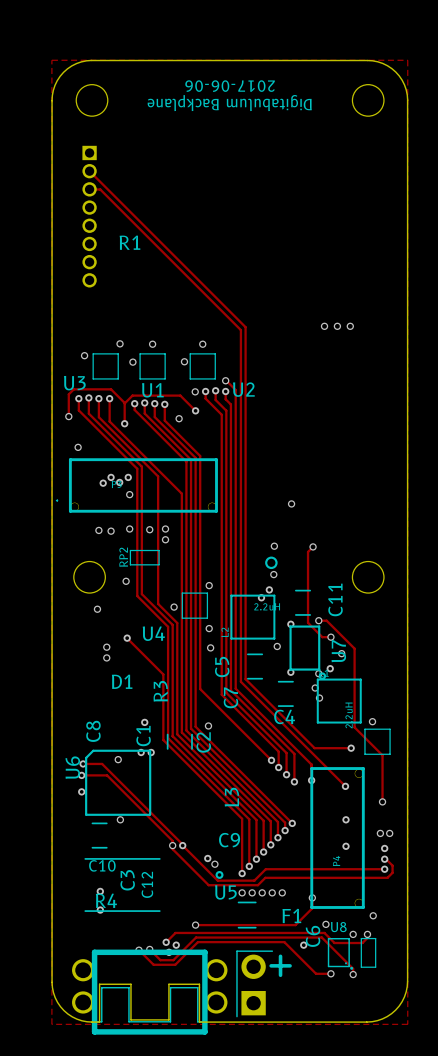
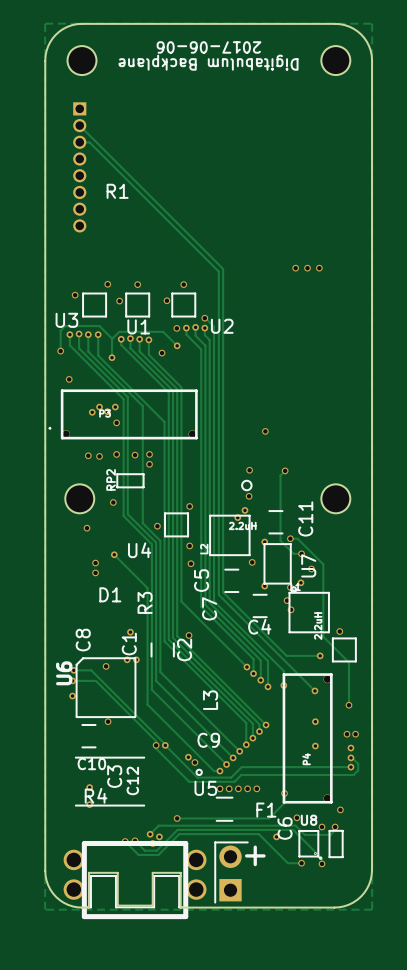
track: (177, 734) (263, 820) (263, 852) -> (160, 643) (160, 671) (239, 751)
track: (172, 736) (256, 819) (256, 859) -> (156, 644) (156, 680) (233, 757)
track: (168, 738) (249, 819) (249, 866) -> (151, 646) (151, 689) (226, 764)
track: (163, 740) (242, 818) (242, 873) -> (147, 648) (147, 704) (214, 771) (219, 771)

